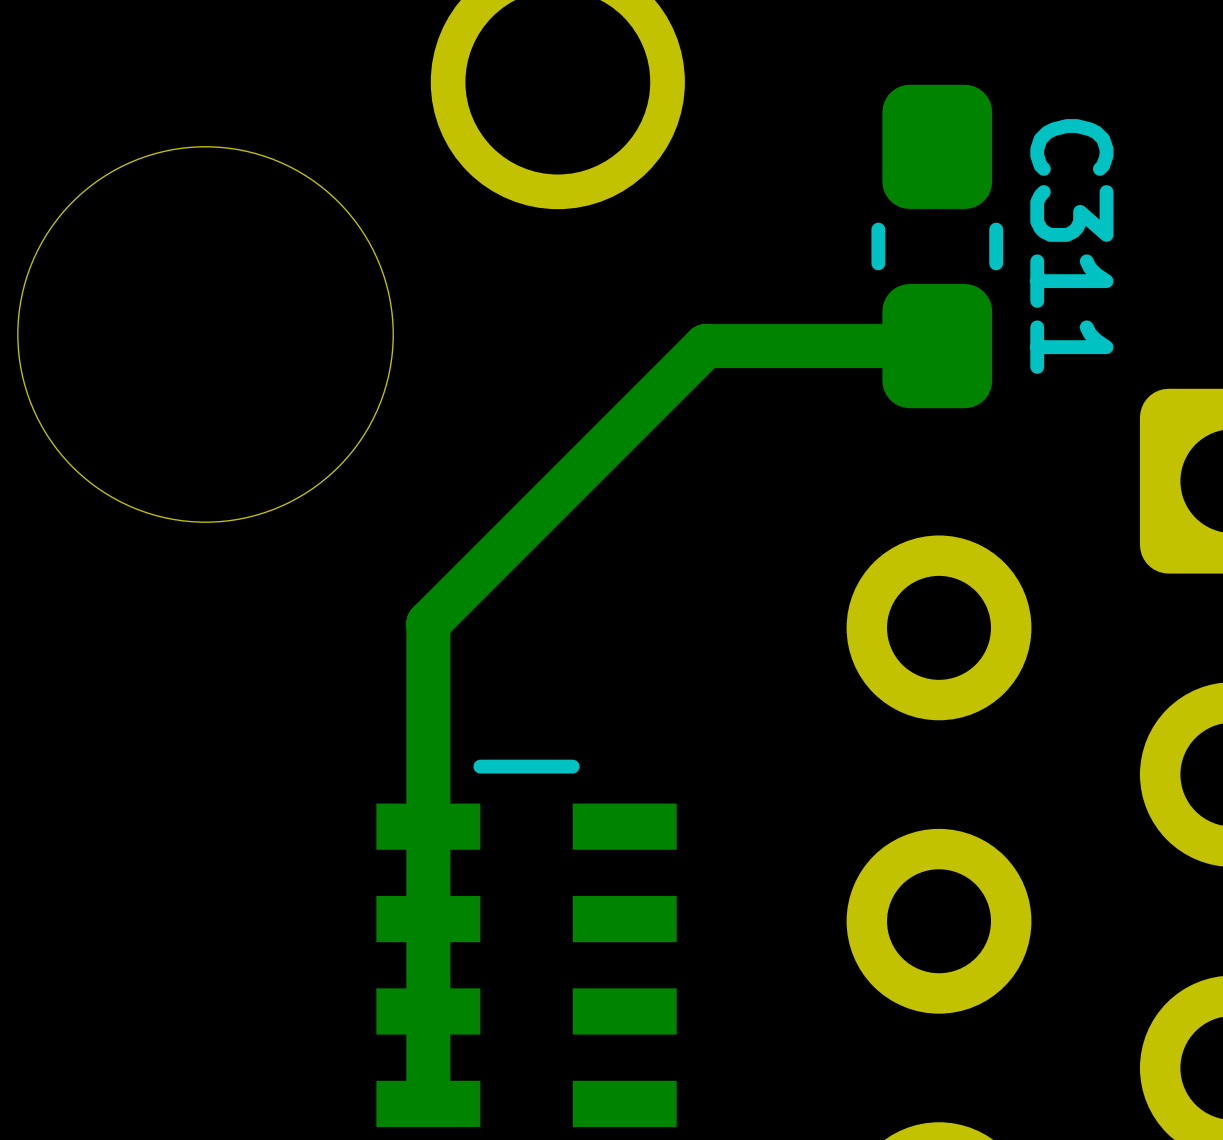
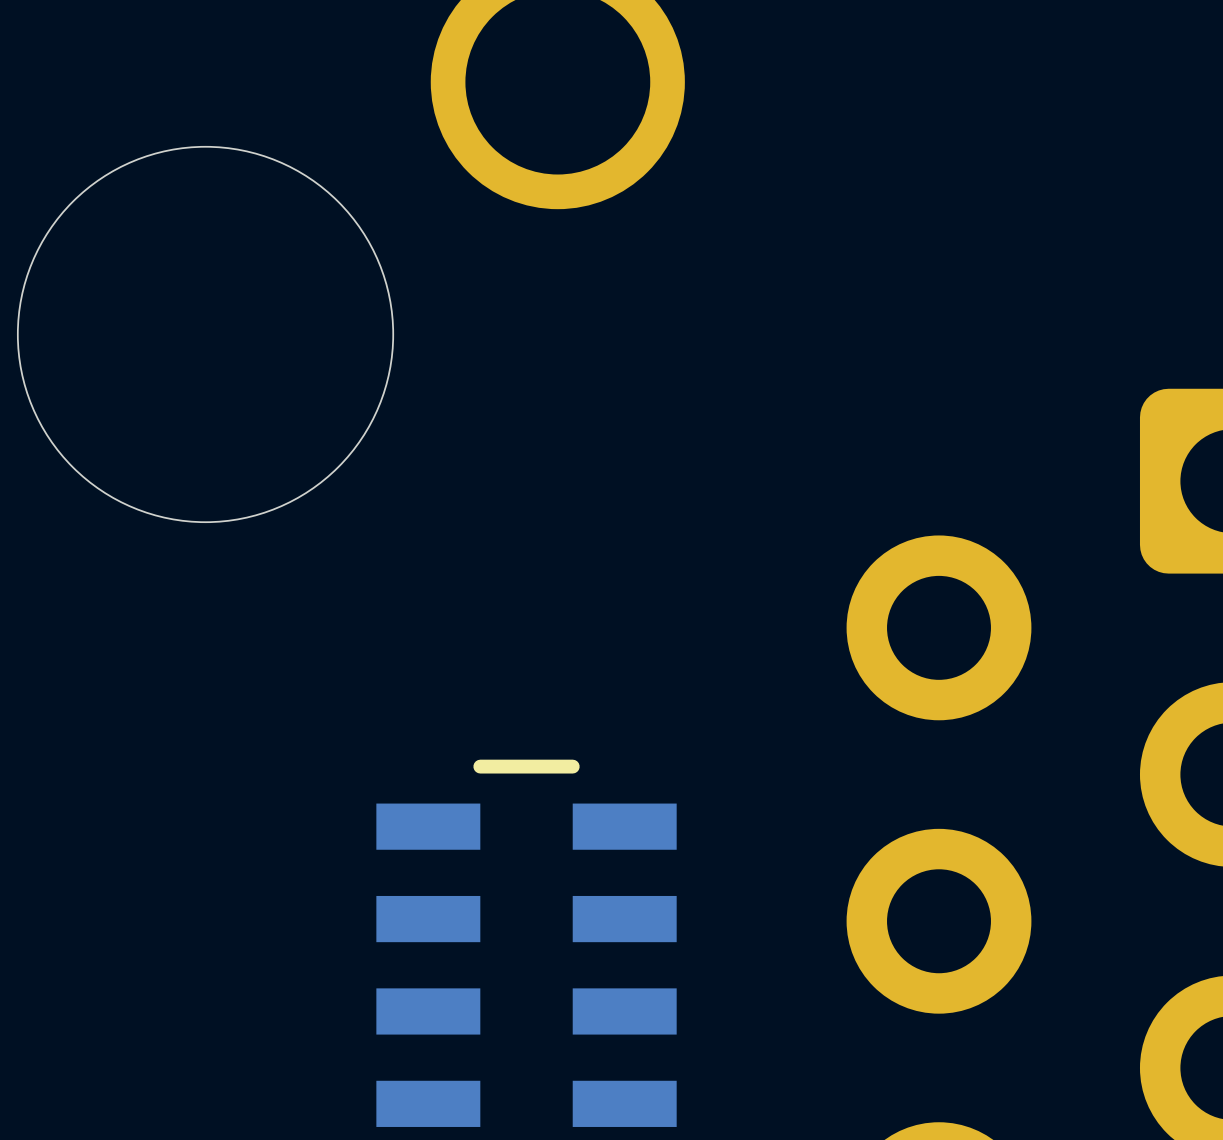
C311: (937, 246) -> none
track: (937, 346) (705, 346) (428, 623) (428, 1103) -> none

